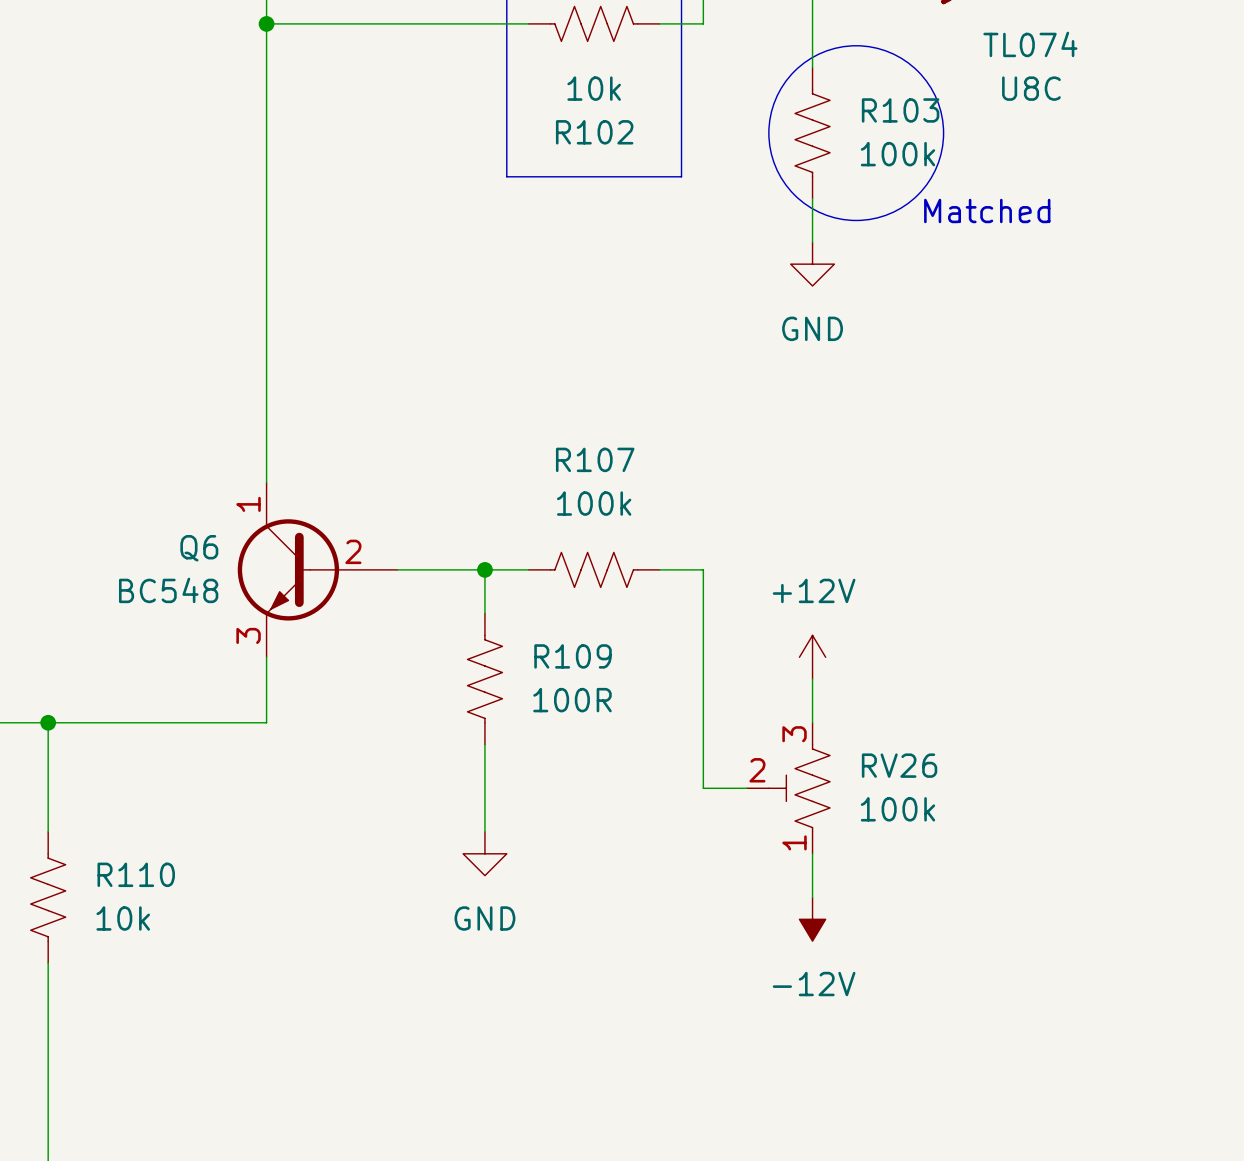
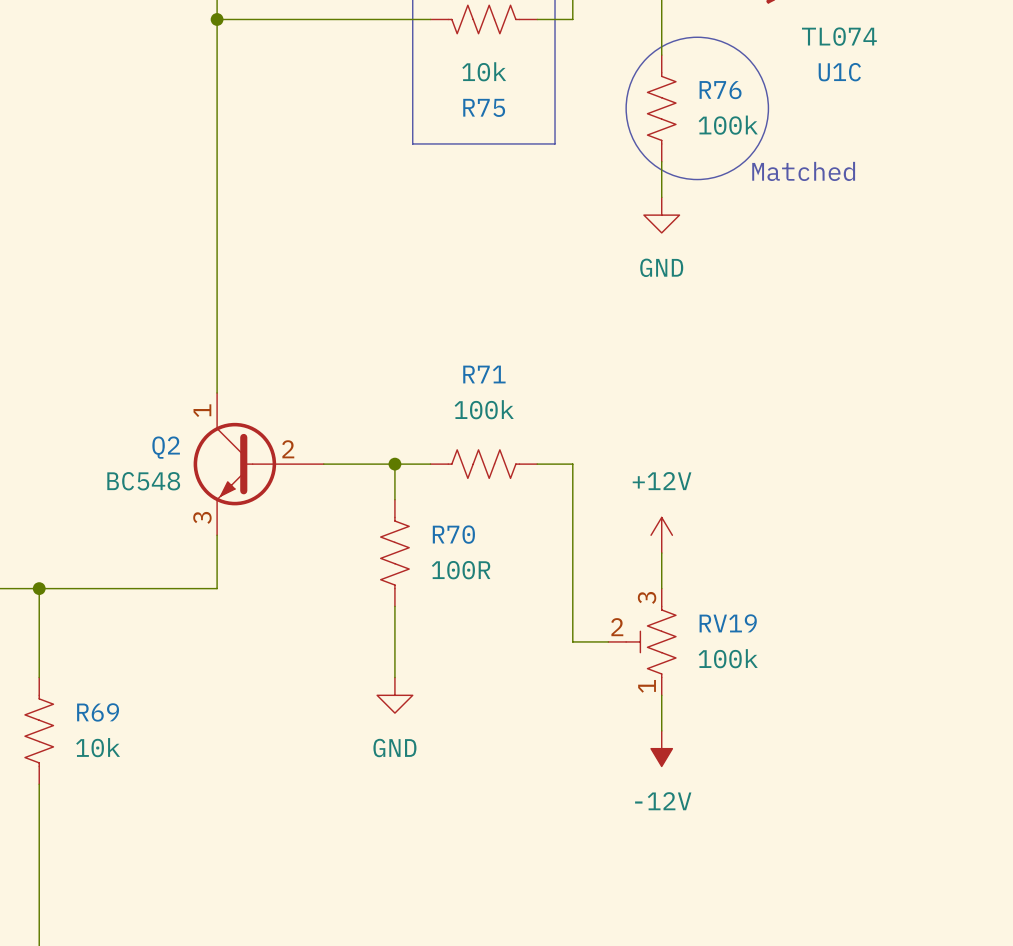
U8C name: U8C (1031, 88) -> U1C (839, 72)
R103 name: R103 (900, 110) -> R76 (720, 90)
R102 name: R102 (594, 132) -> R75 (484, 107)
R107 name: R107 (595, 459) -> R71 (484, 374)
Q6 name: Q6 (199, 548) -> Q2 (166, 447)
R109 name: R109 (573, 656) -> R70 (453, 534)
RV26 name: RV26 (899, 765) -> RV19 (728, 623)
R110 name: R110 (136, 874) -> R69 (98, 712)

